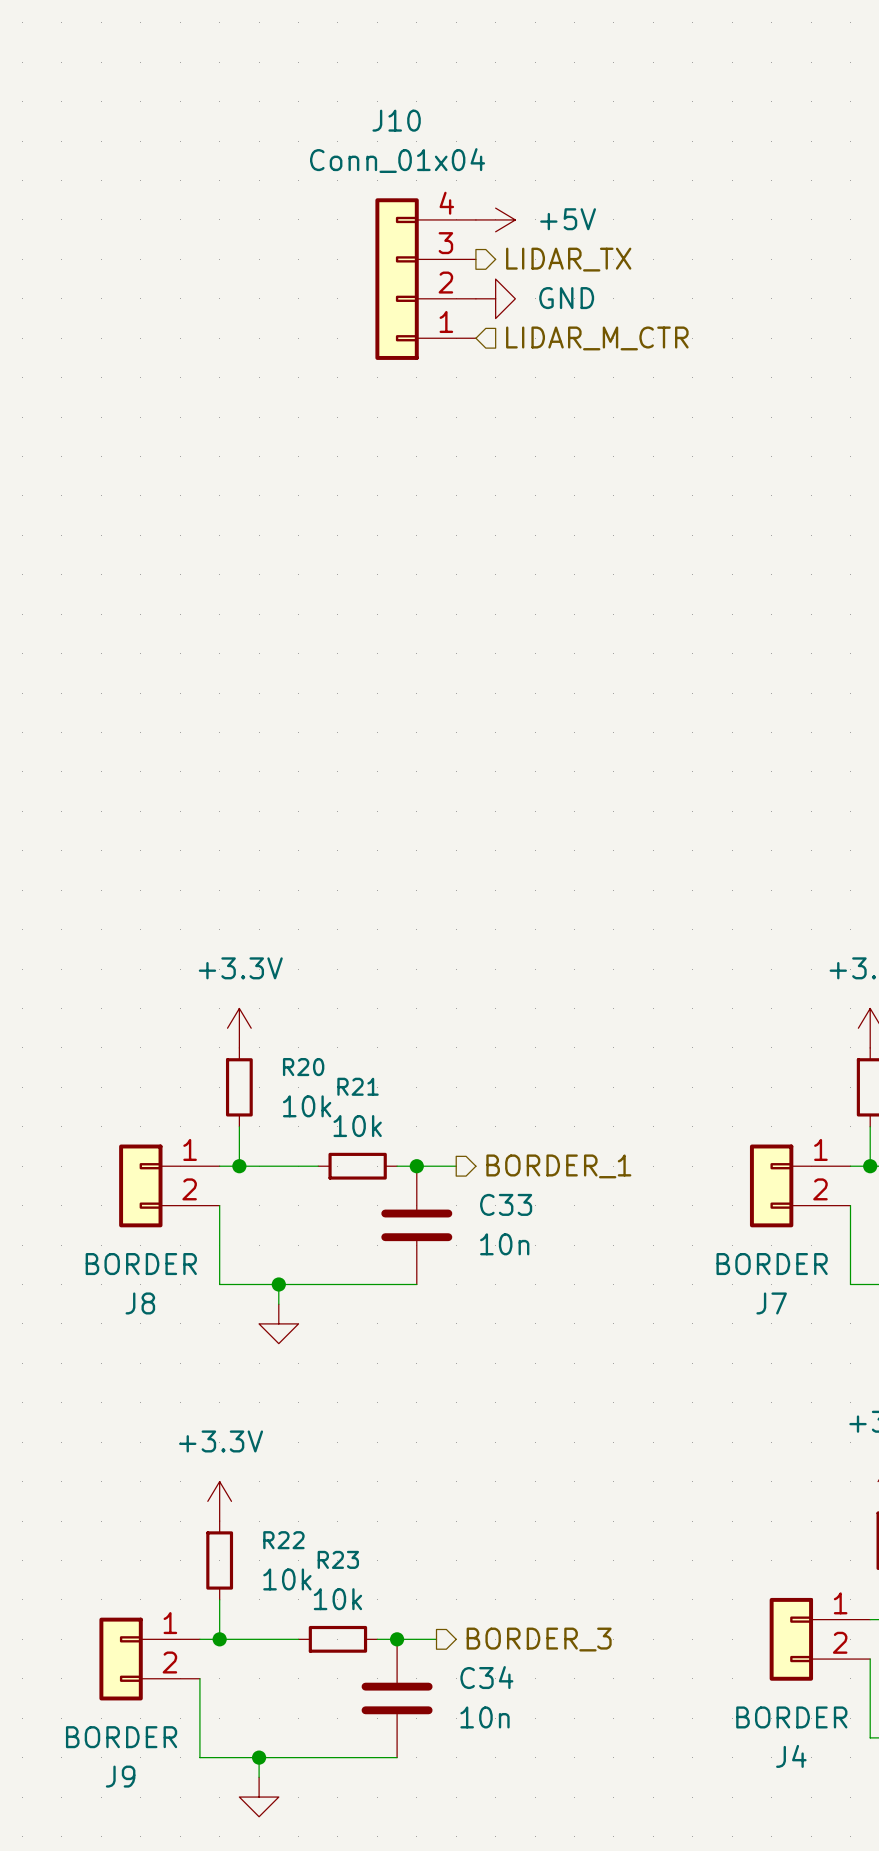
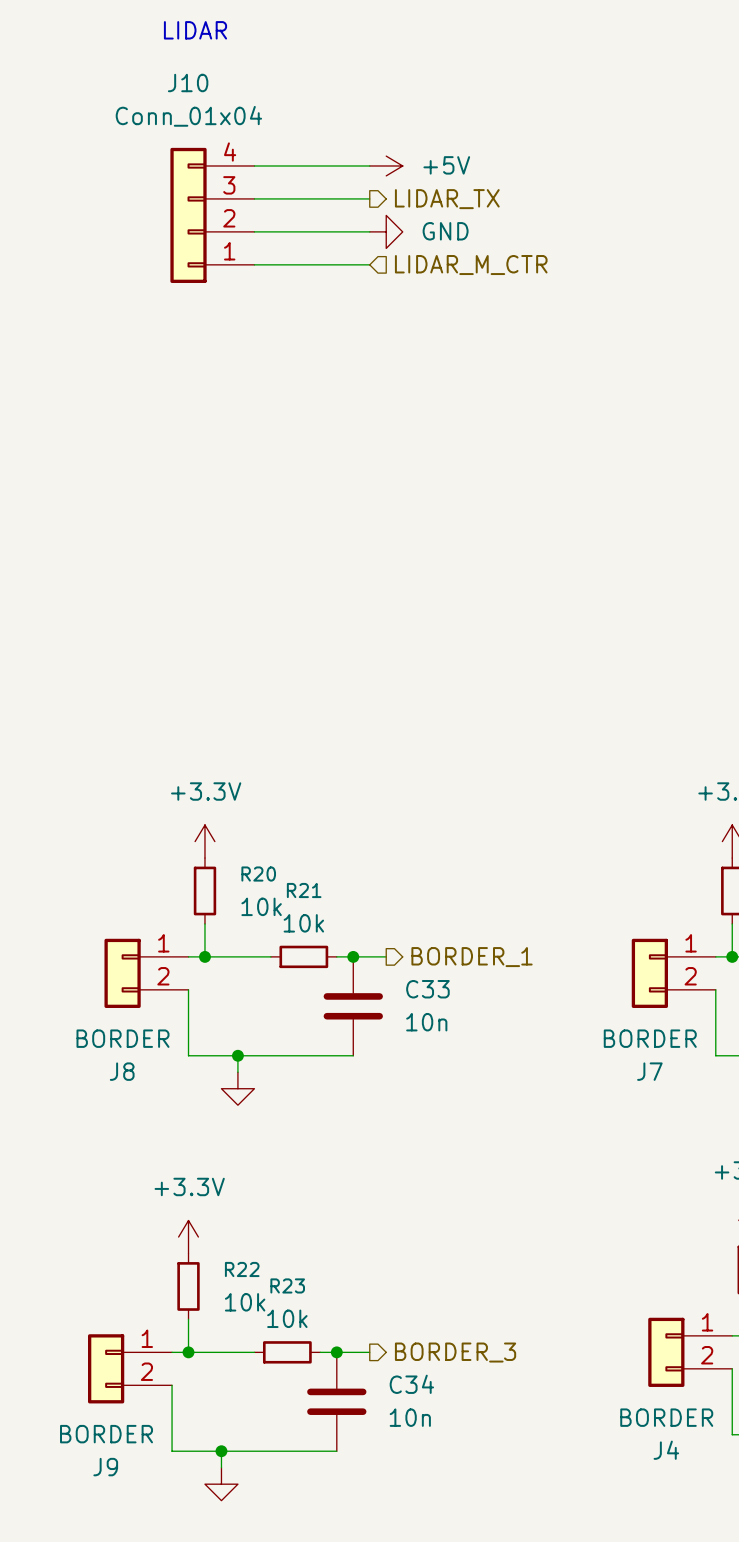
text: none -> LIDAR (195, 30)
wire: none -> (254, 165) (369, 165)
power symbol position: +5V (495, 219) -> +5V (386, 165)
wire: none -> (254, 198) (369, 198)
hierarchical label position: LIDAR_TX (568, 259) -> LIDAR_TX (447, 199)
J10 position: (425, 279) -> (212, 215)
wire: none -> (254, 231) (369, 231)
power symbol position: GND (495, 298) -> GND (386, 231)
wire: none -> (254, 264) (369, 264)
hierarchical label position: LIDAR_M_CTR (597, 338) -> LIDAR_M_CTR (471, 265)

